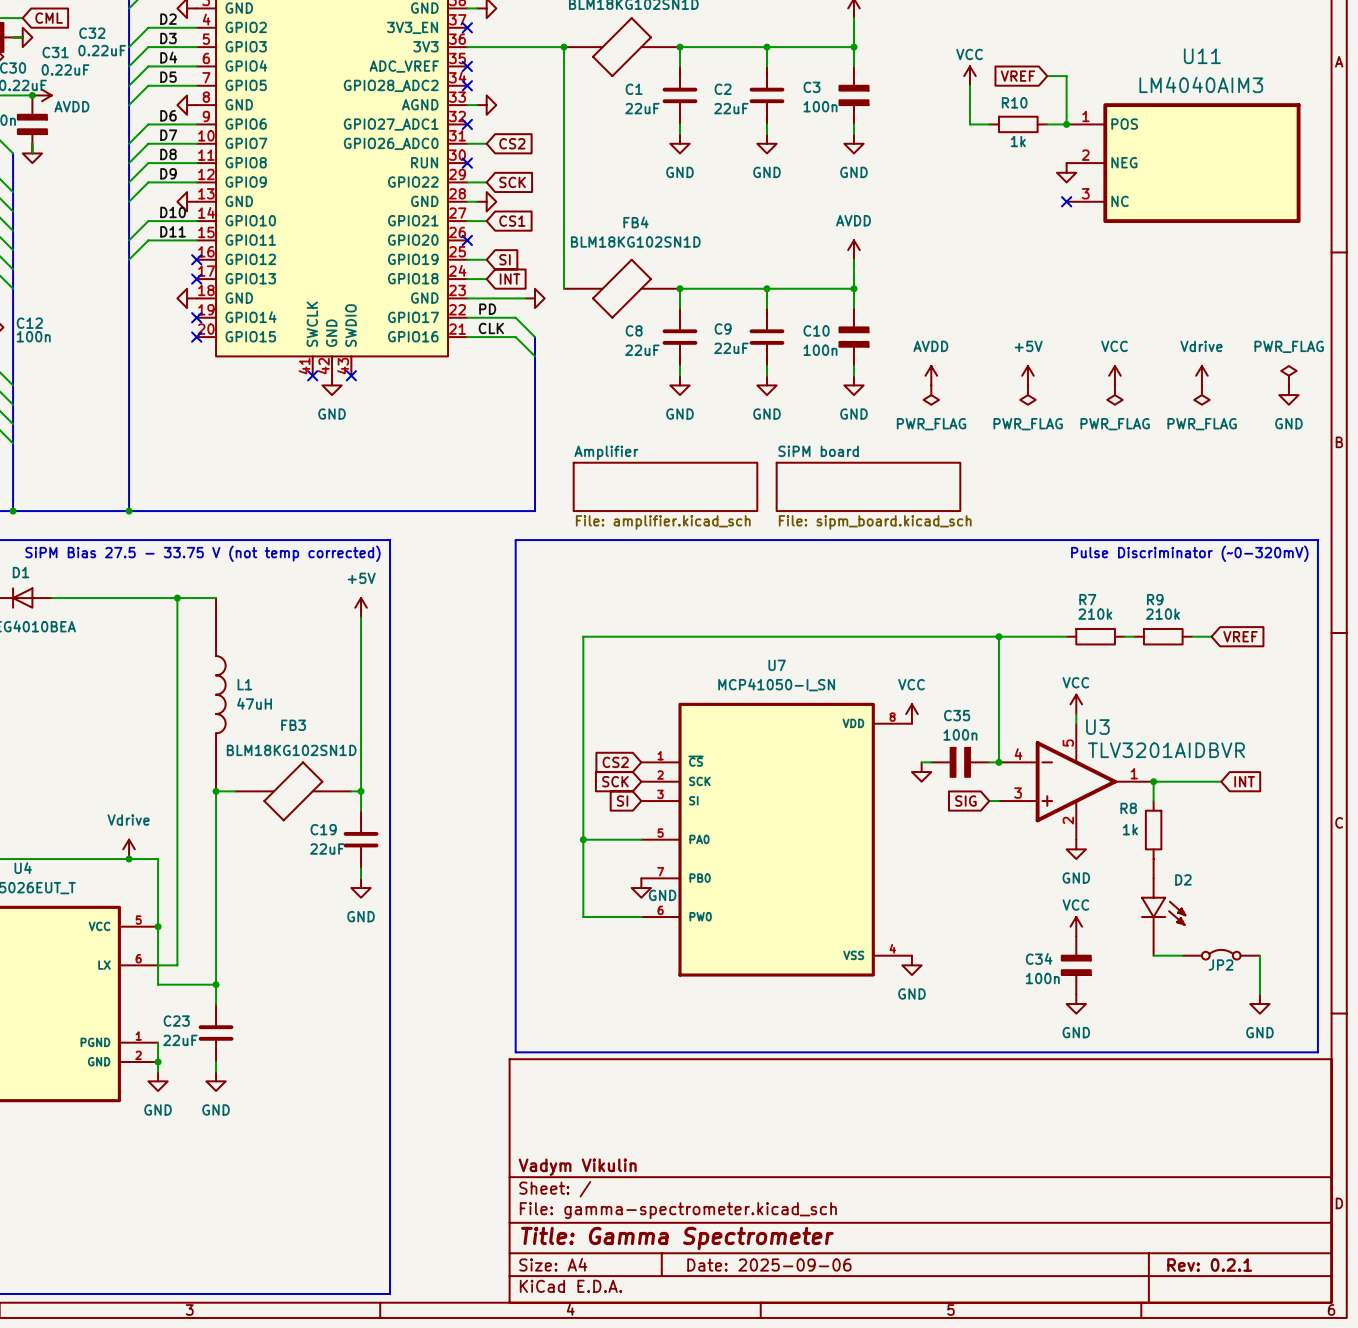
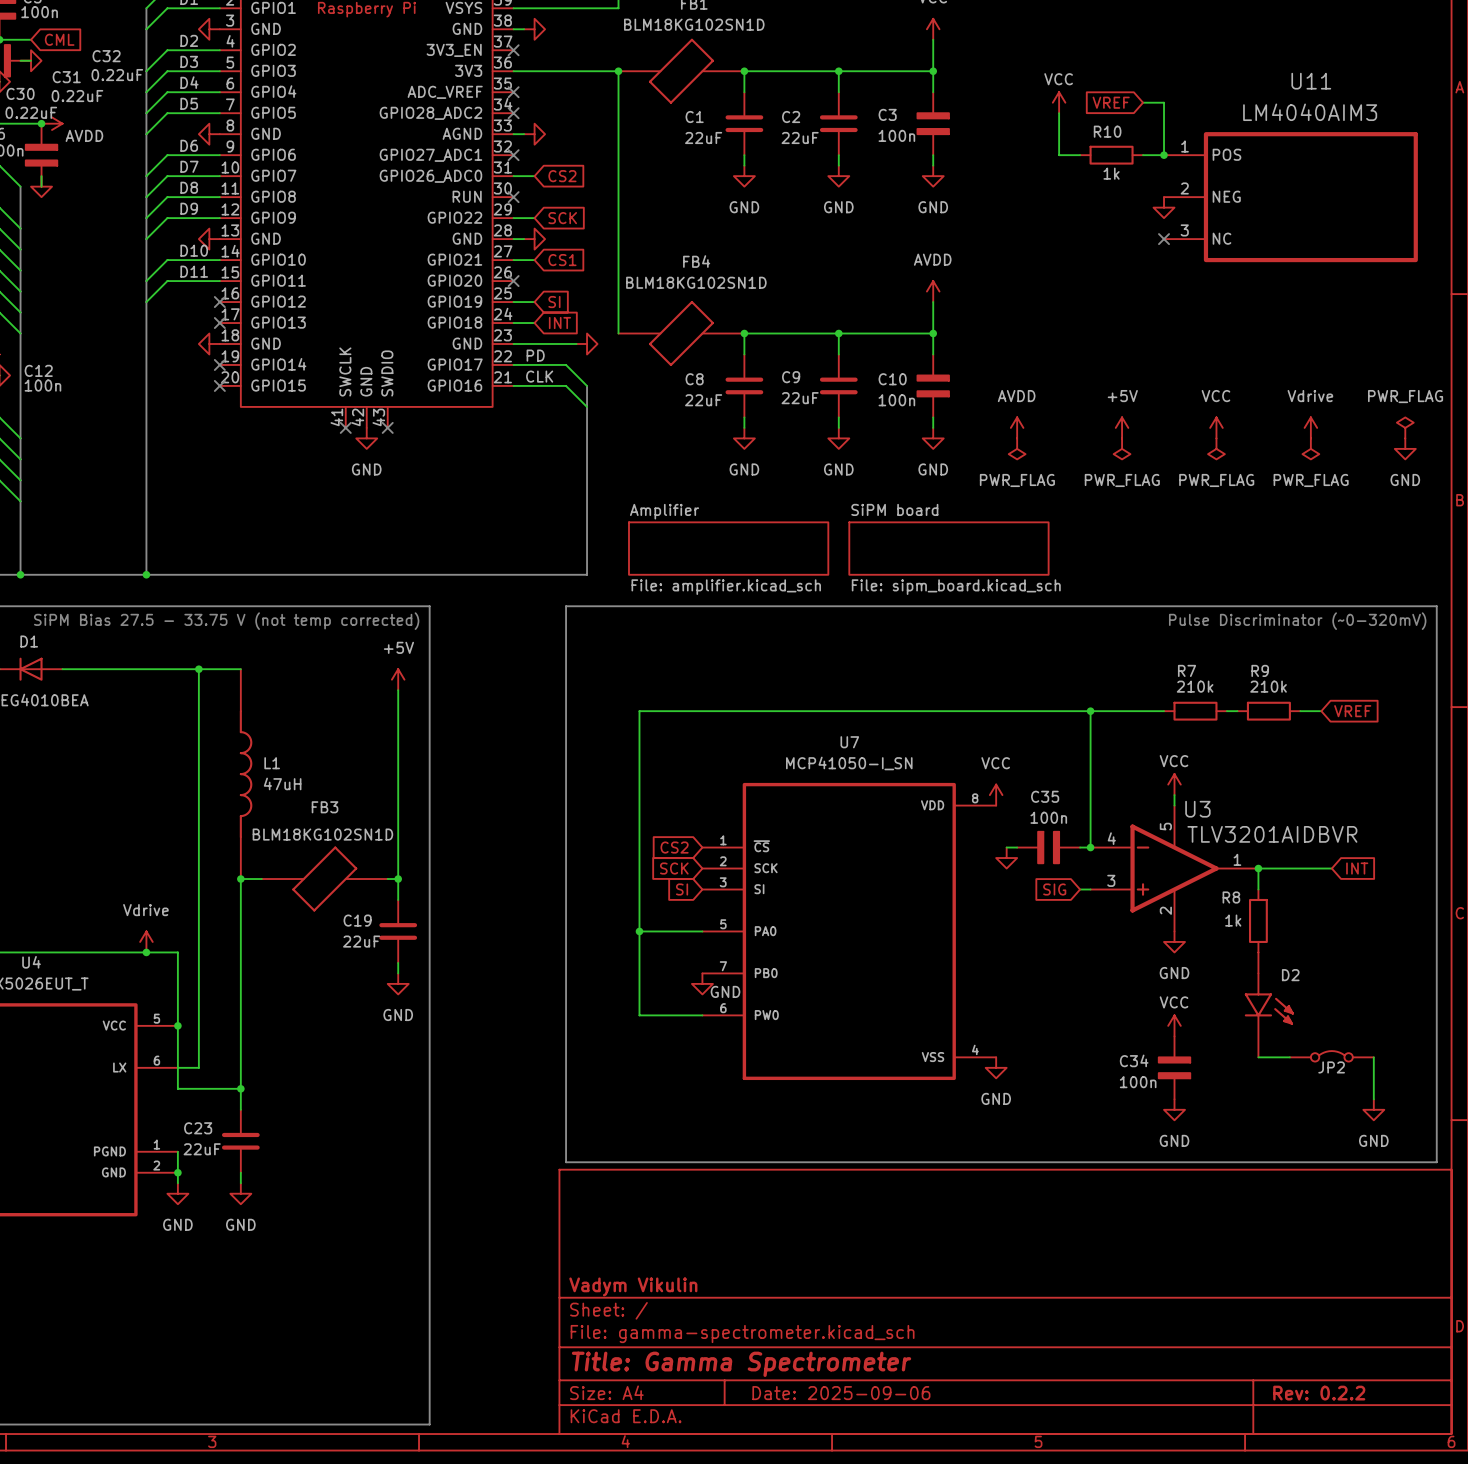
title block: Rev: 0.2.1 (1209, 1265) -> Rev: 0.2.2 (1319, 1393)

